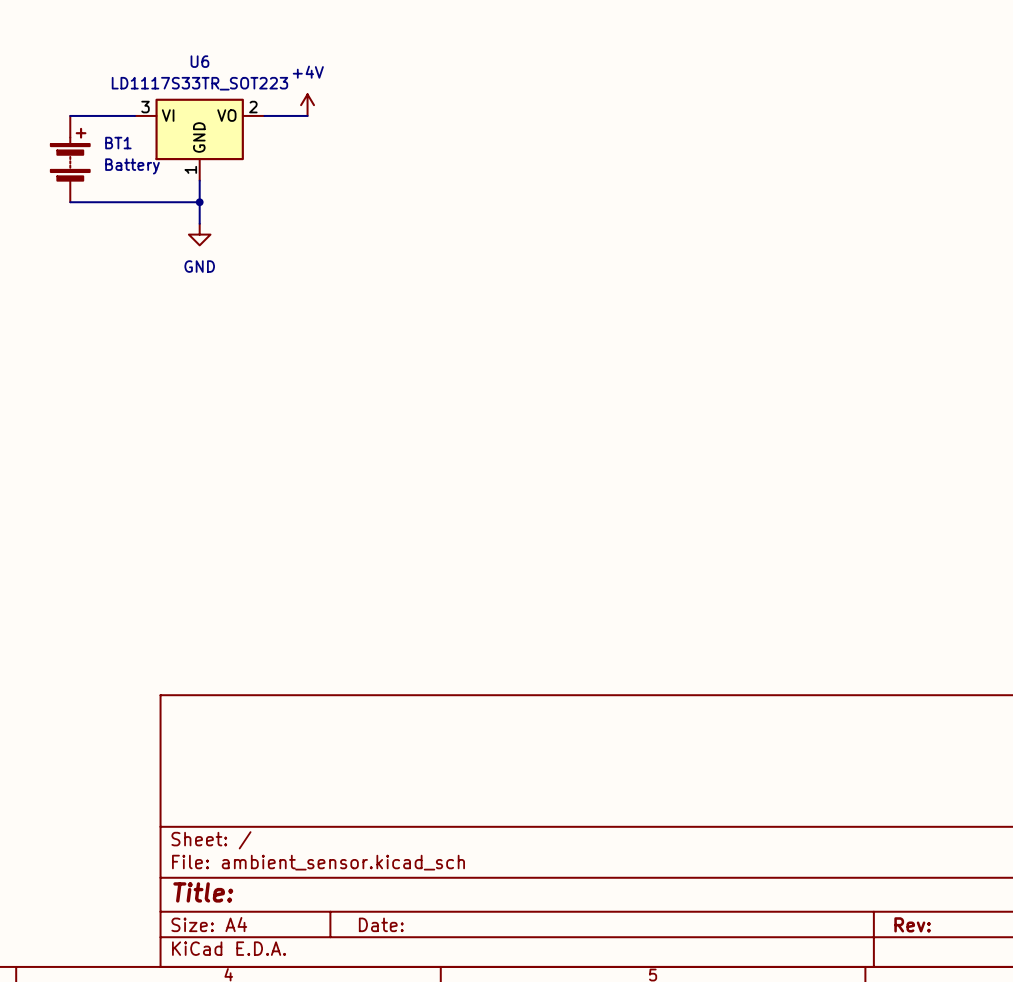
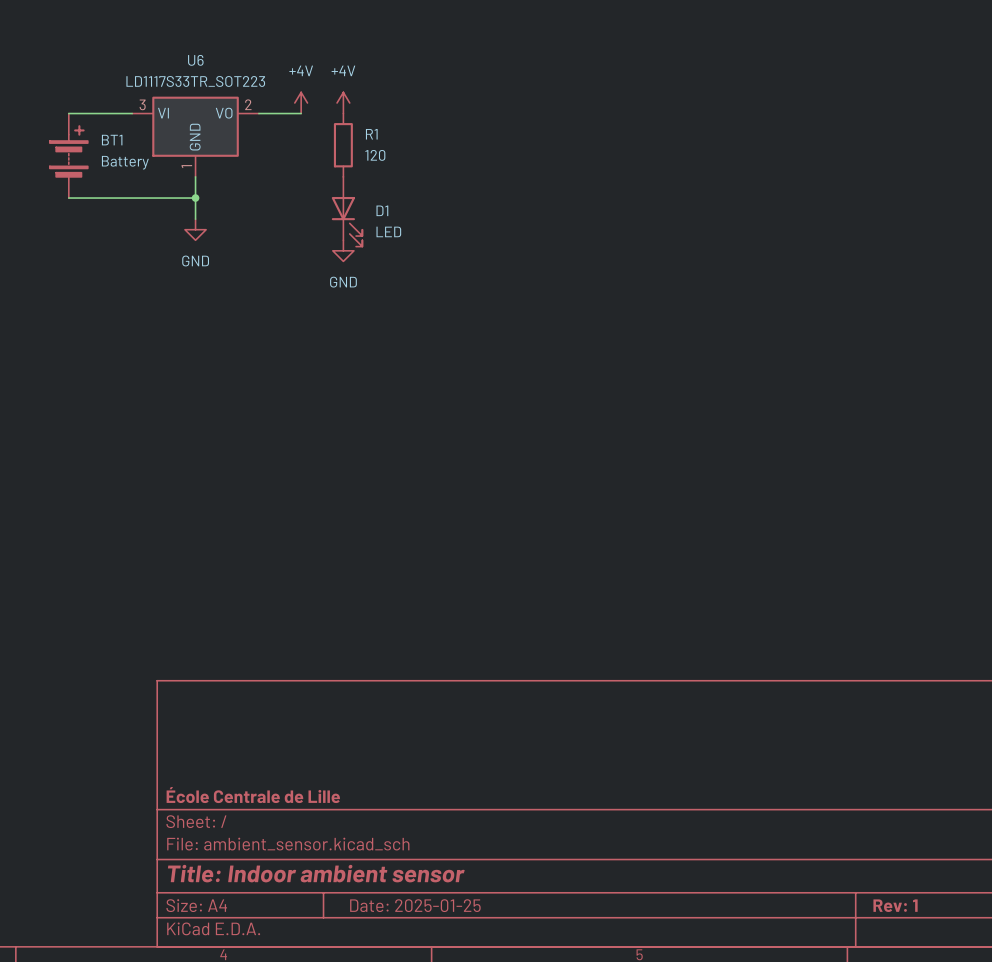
power symbol: none -> +4V (343, 102)
R1: none -> 120 (343, 145)
D1: none -> LED (347, 211)
power symbol: none -> GND (343, 250)
title block: none -> École Centrale de Lille (253, 795)
title block: Title: (203, 892) -> Title: Indoor ambient sensor (316, 873)
title block: Date: (381, 924) -> Date: 2025-01-25 (415, 905)
title block: Rev: (912, 924) -> Rev: 1 (895, 905)

